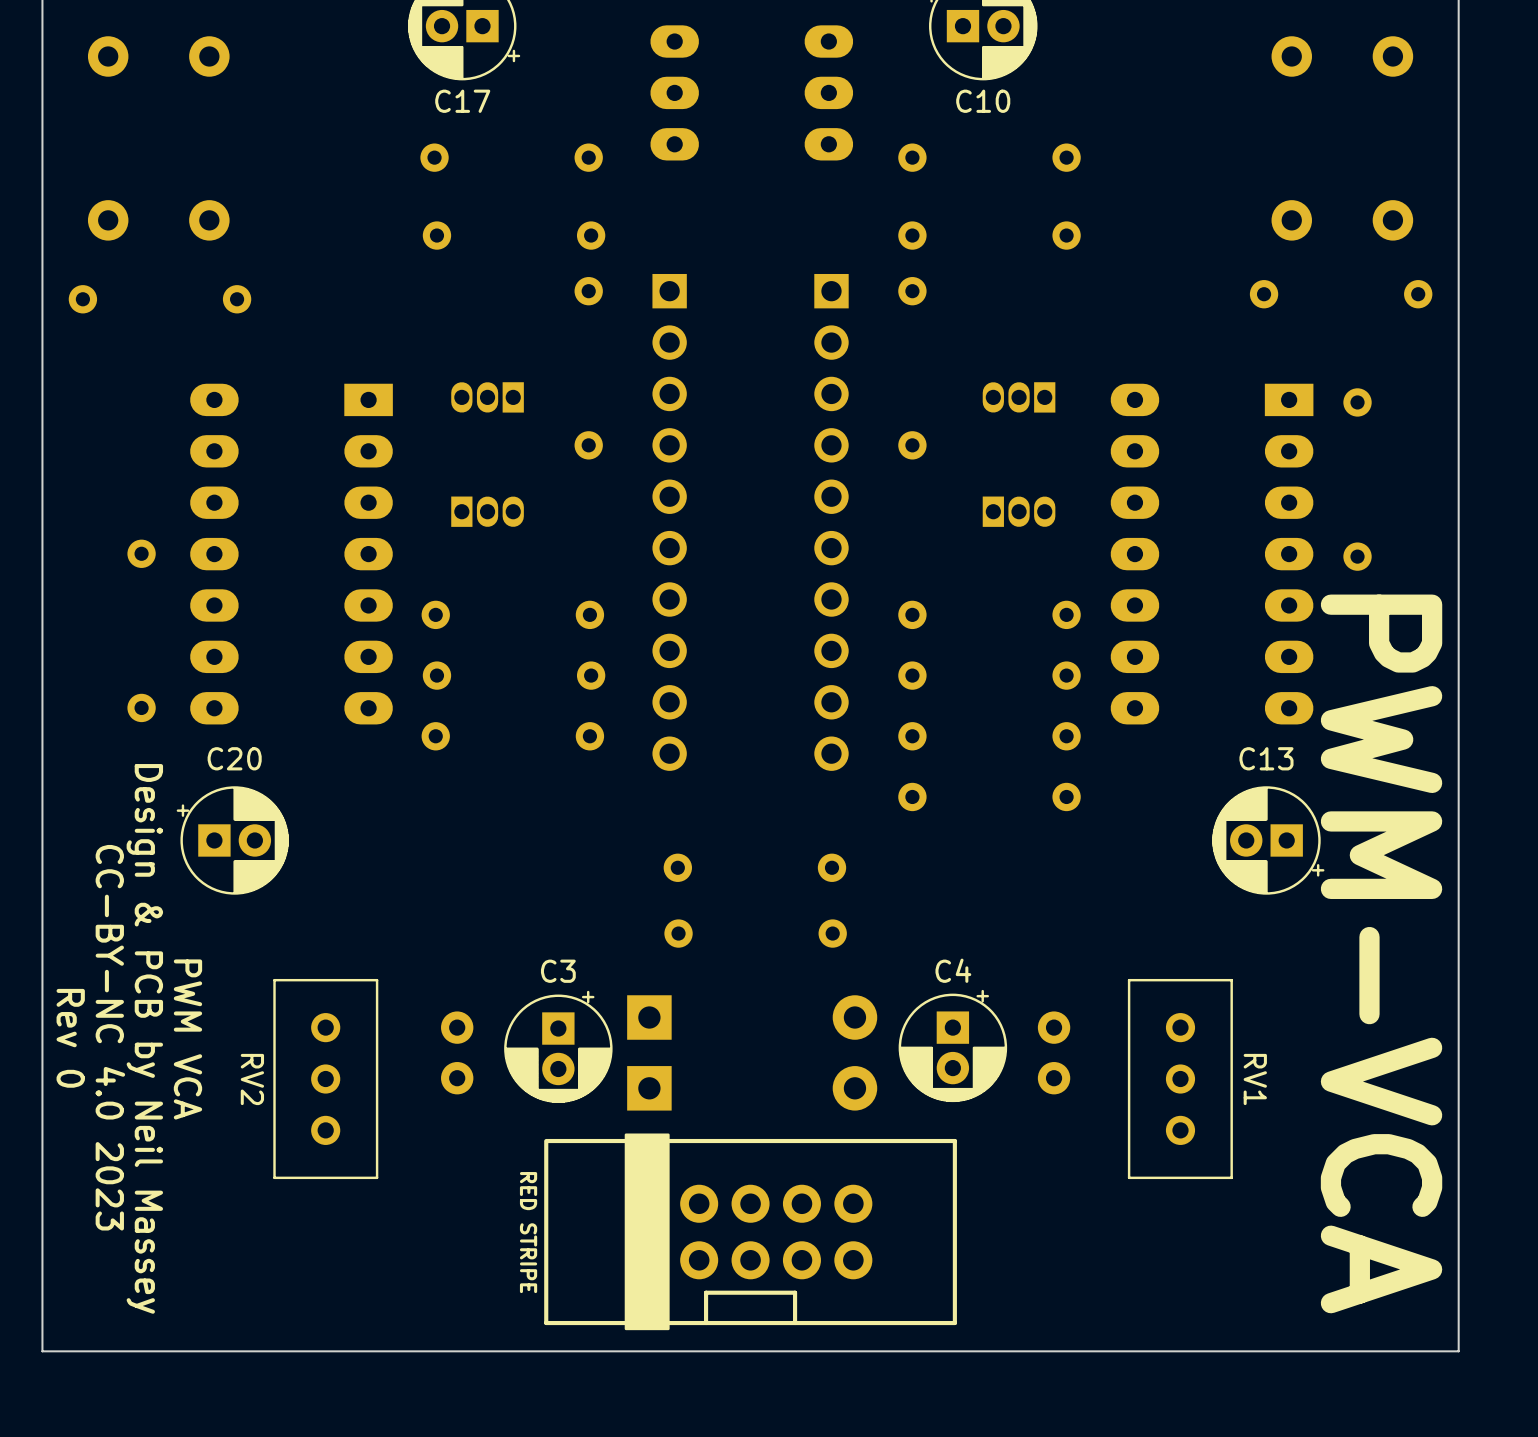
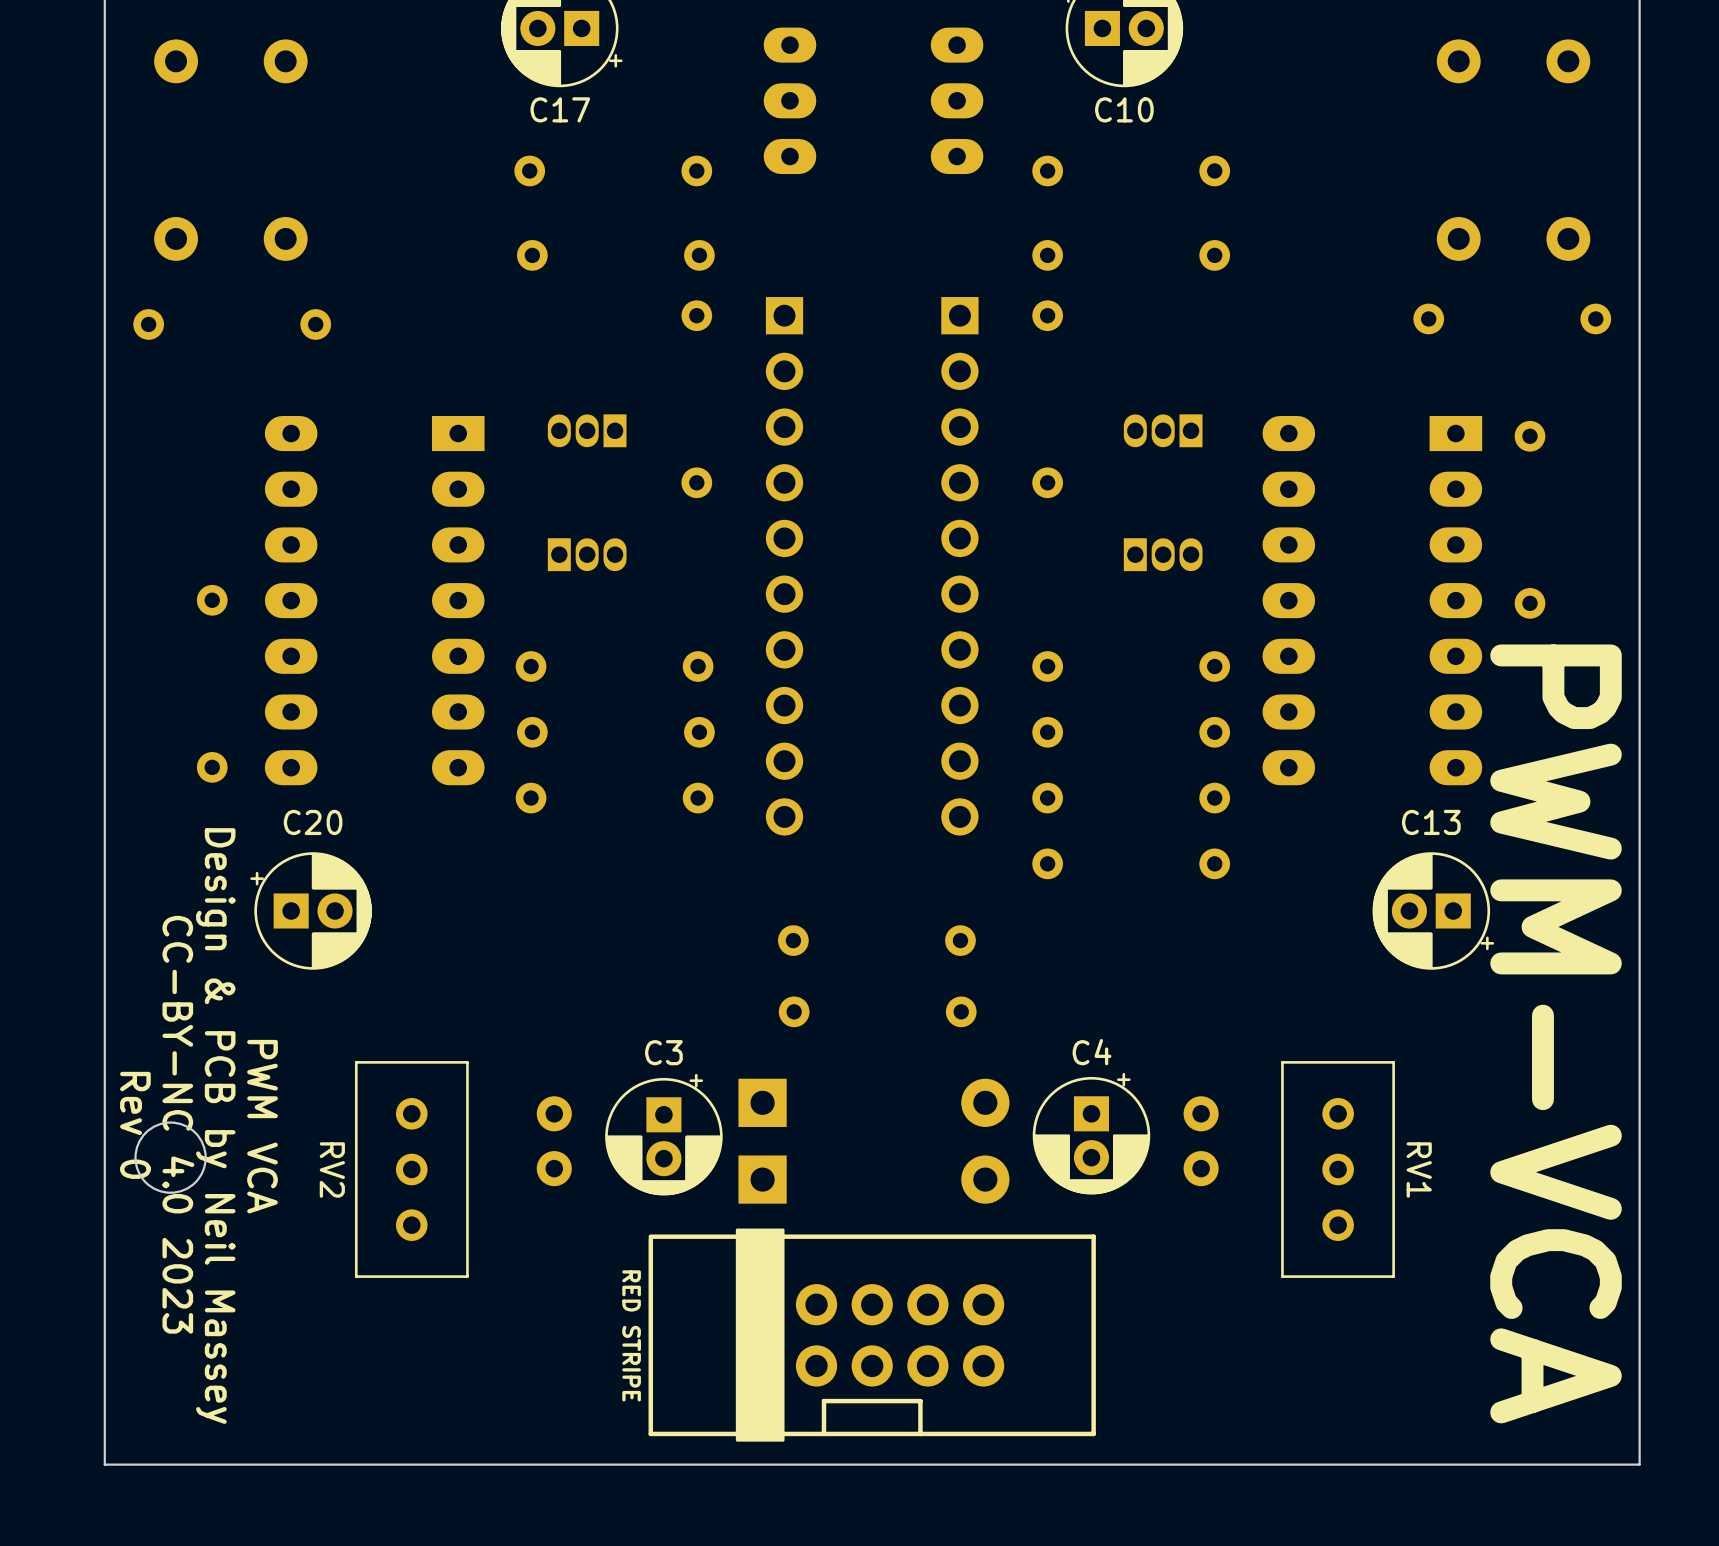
round board edge: none -> [134, 1121, 207, 1194]

